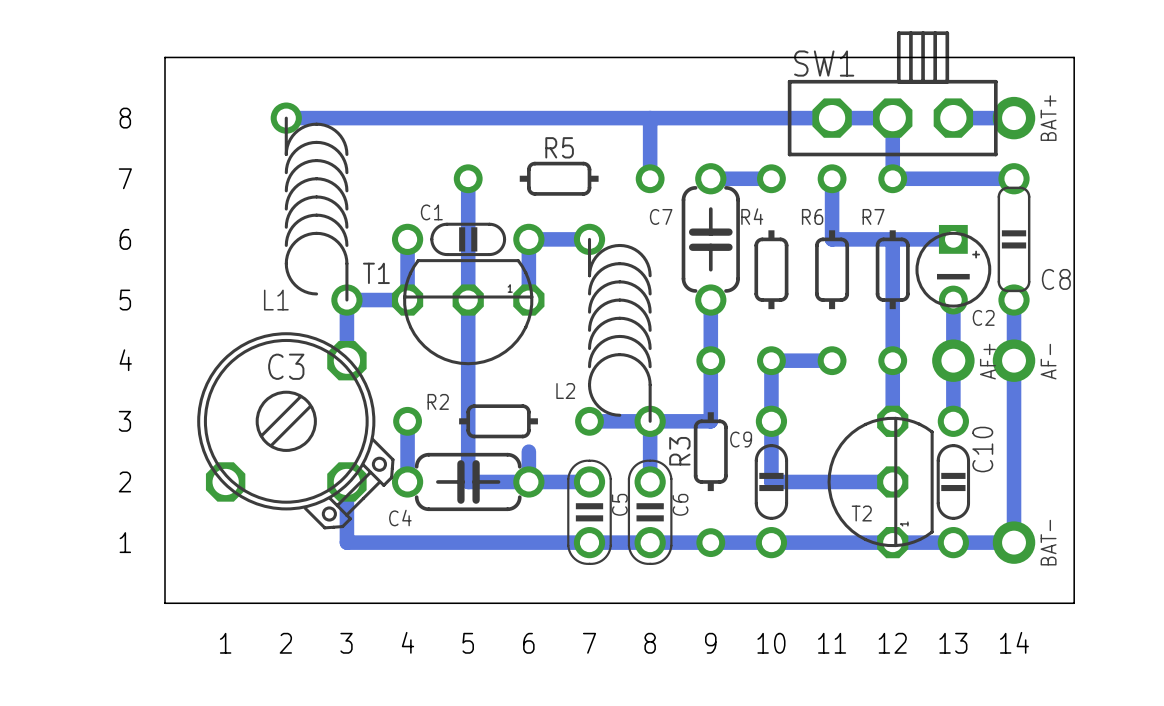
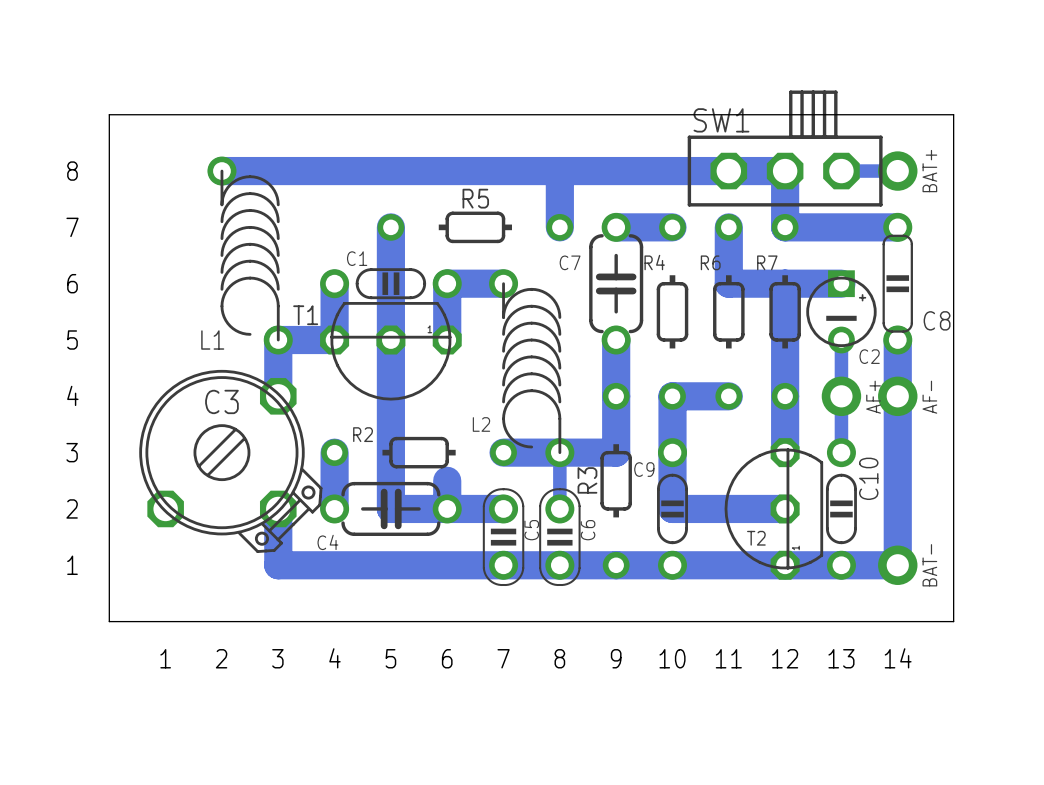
bottom track width: thin (286, 118) (892, 118) (892, 178) (1014, 178) -> thick (221, 171) (785, 171) (785, 227) (897, 227)
bottom track width: thin (650, 118) (650, 178) -> thick (559, 171) (559, 227)
bottom track width: thin (468, 178) (468, 481) (589, 481) -> thick (390, 227) (390, 508) (503, 508)
bottom track width: thin (710, 178) (771, 178) -> thick (616, 227) (672, 227)
bottom track width: thin (832, 178) (832, 239) (953, 239) -> thick (728, 227) (728, 283) (841, 283)
bottom track width: thin (407, 239) (407, 300) (346, 300) (346, 360) -> thick (334, 283) (334, 340) (278, 340) (278, 396)
bottom track width: thin (589, 239) (528, 239) (528, 300) -> thick (503, 283) (447, 283) (447, 340)
bottom track width: thin (892, 239) (892, 421) -> thick (785, 283) (785, 452)
bottom track width: thin (710, 300) (710, 421) (589, 421) -> thick (616, 340) (616, 452) (503, 452)
bottom track width: thin (1014, 300) (1014, 542) (346, 542) (346, 481) -> thick (897, 340) (897, 565) (278, 565) (278, 508)
bottom track width: thin (832, 360) (771, 360) (771, 481) (892, 481) -> thick (728, 396) (672, 396) (672, 508) (785, 508)
bottom track width: thin (407, 421) (407, 481) -> thick (334, 452) (334, 508)
bottom track width: thin (528, 451) (528, 481) -> thick (447, 480) (447, 508)

